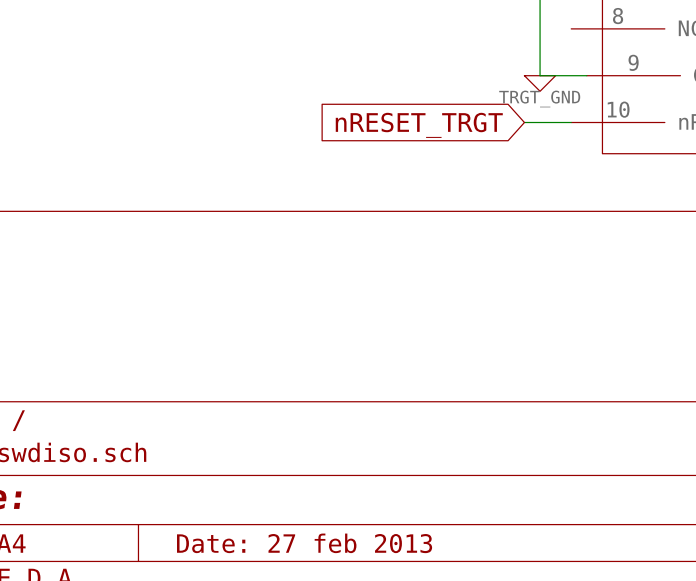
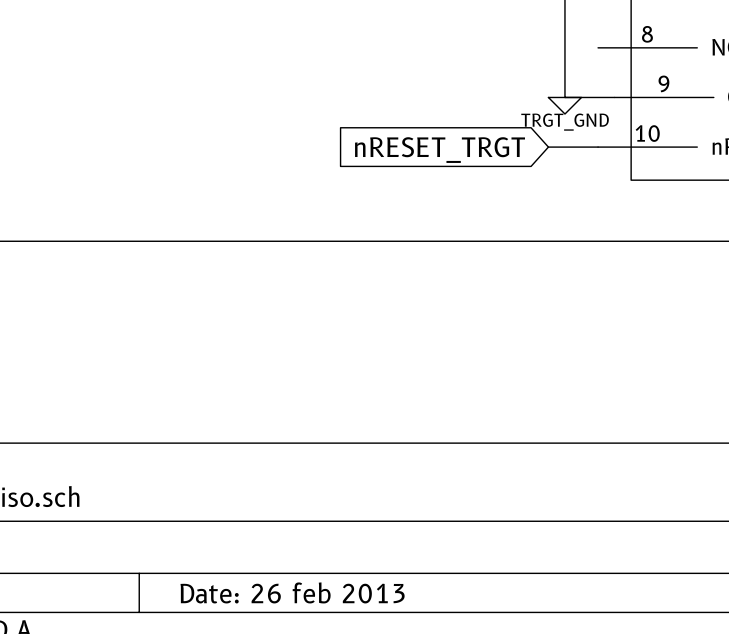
title block: Date: 27 feb 2013 (304, 543) -> Date: 26 feb 2013 (292, 592)

